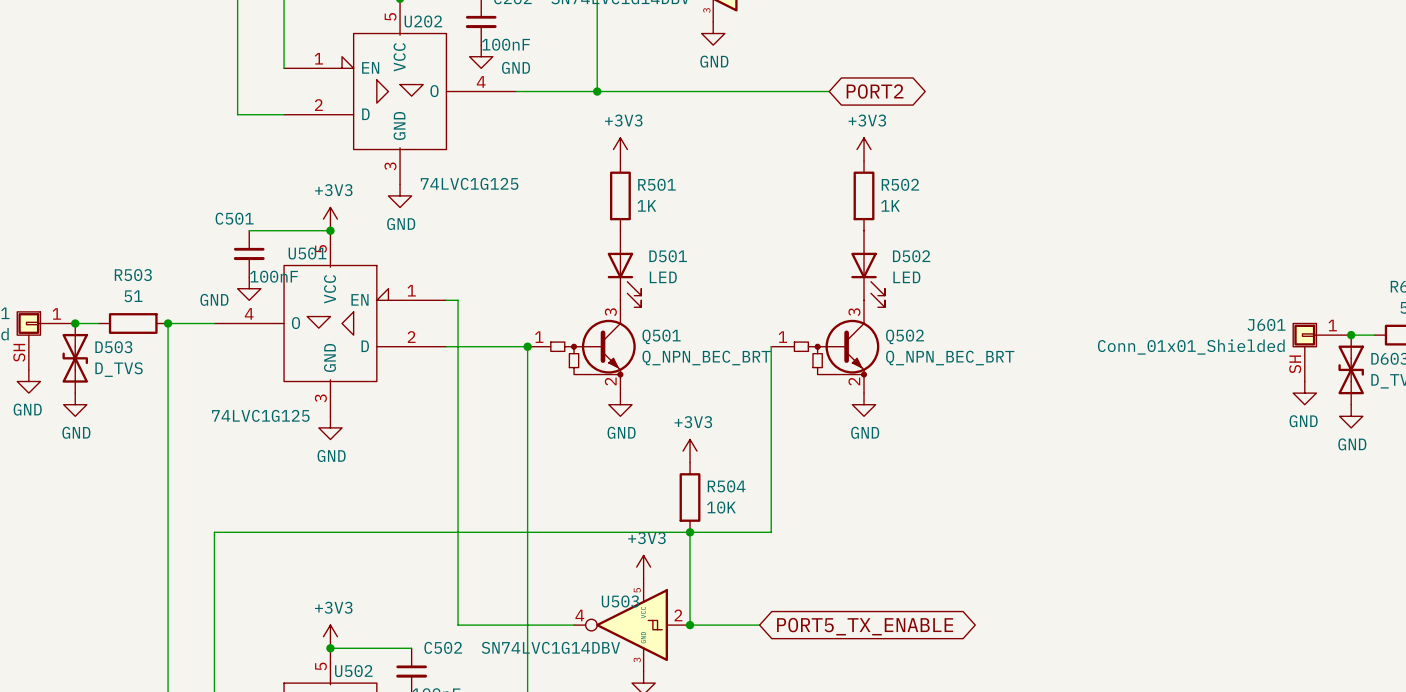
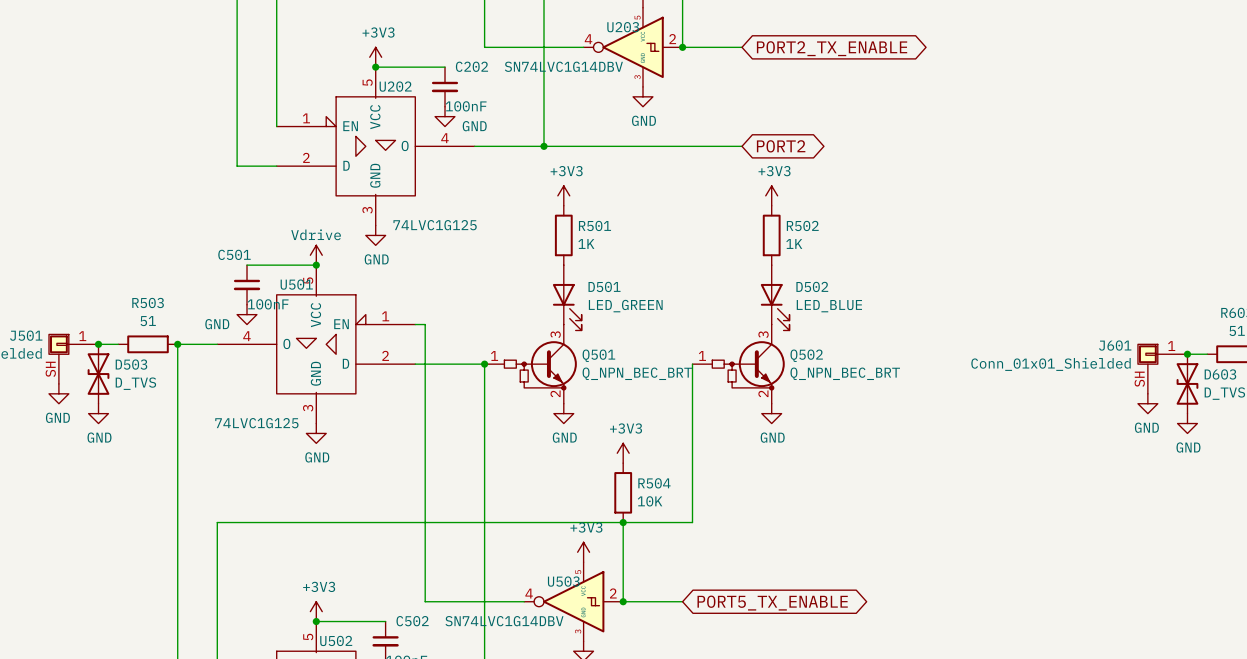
power symbol: +3V3 (330, 219) -> Vdrive (316, 255)
D501 value: LED (663, 277) -> LED_GREEN (625, 306)
D502 value: LED (906, 277) -> LED_BLUE (829, 306)

